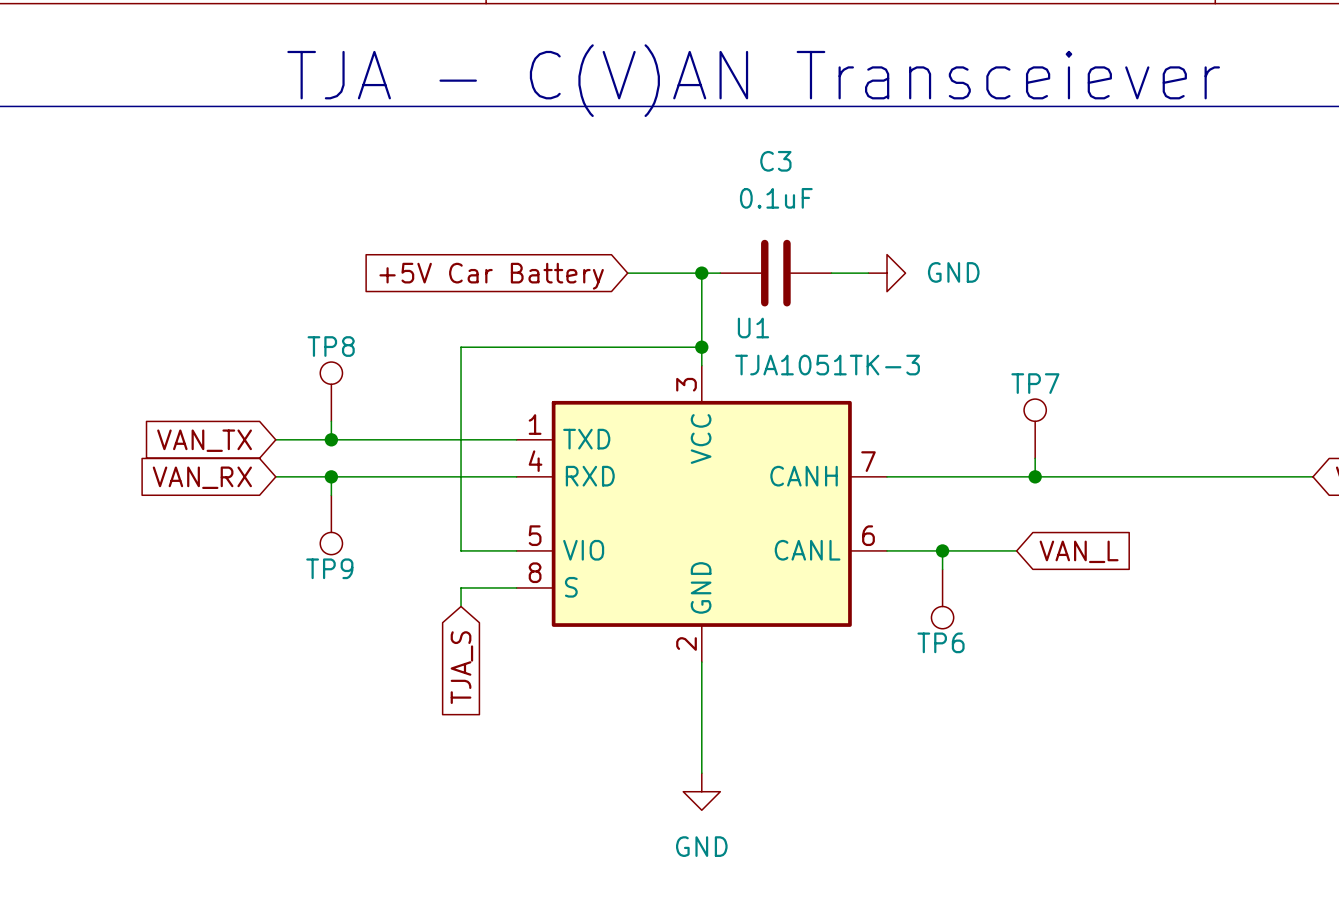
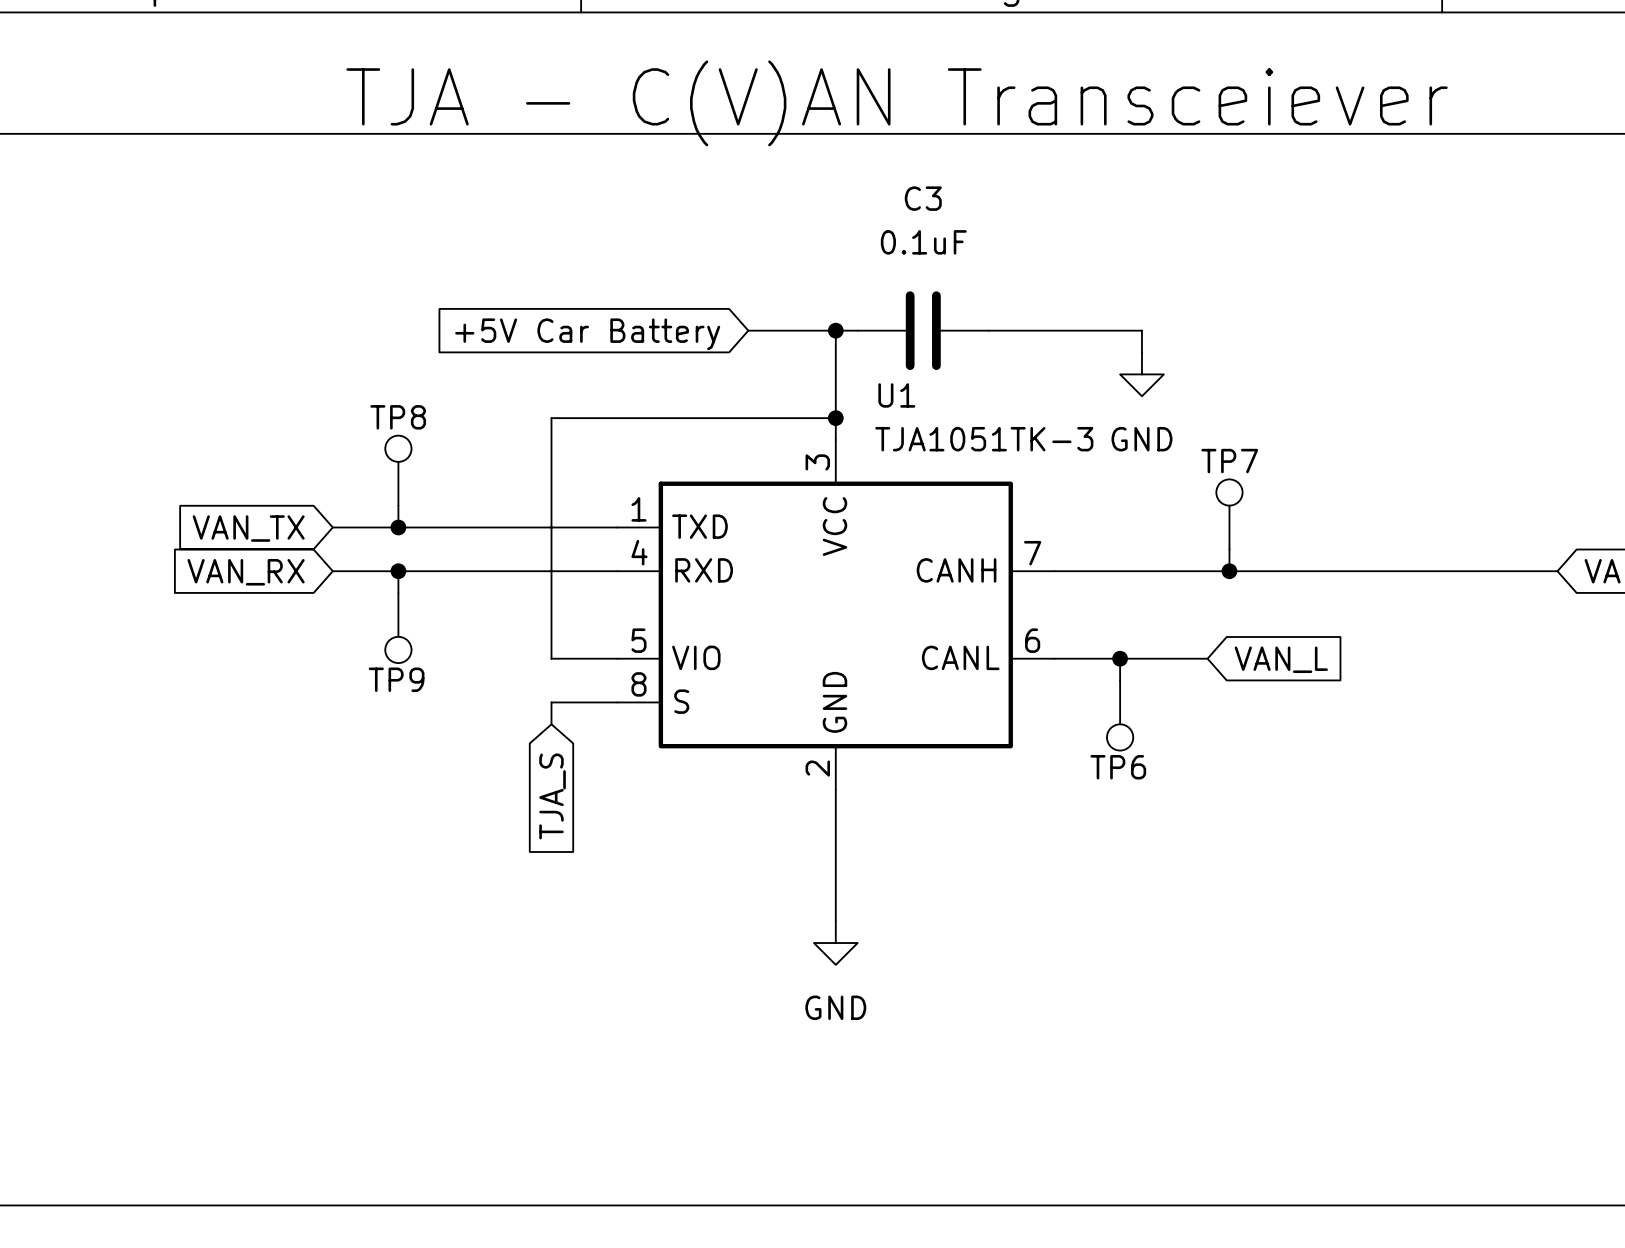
wire: none -> (1032, 330) (1141, 330) (1141, 352)
power symbol rotation: 0° (887, 273) -> 90° clockwise (1141, 374)
power symbol position: GND (887, 273) -> GND (1141, 374)

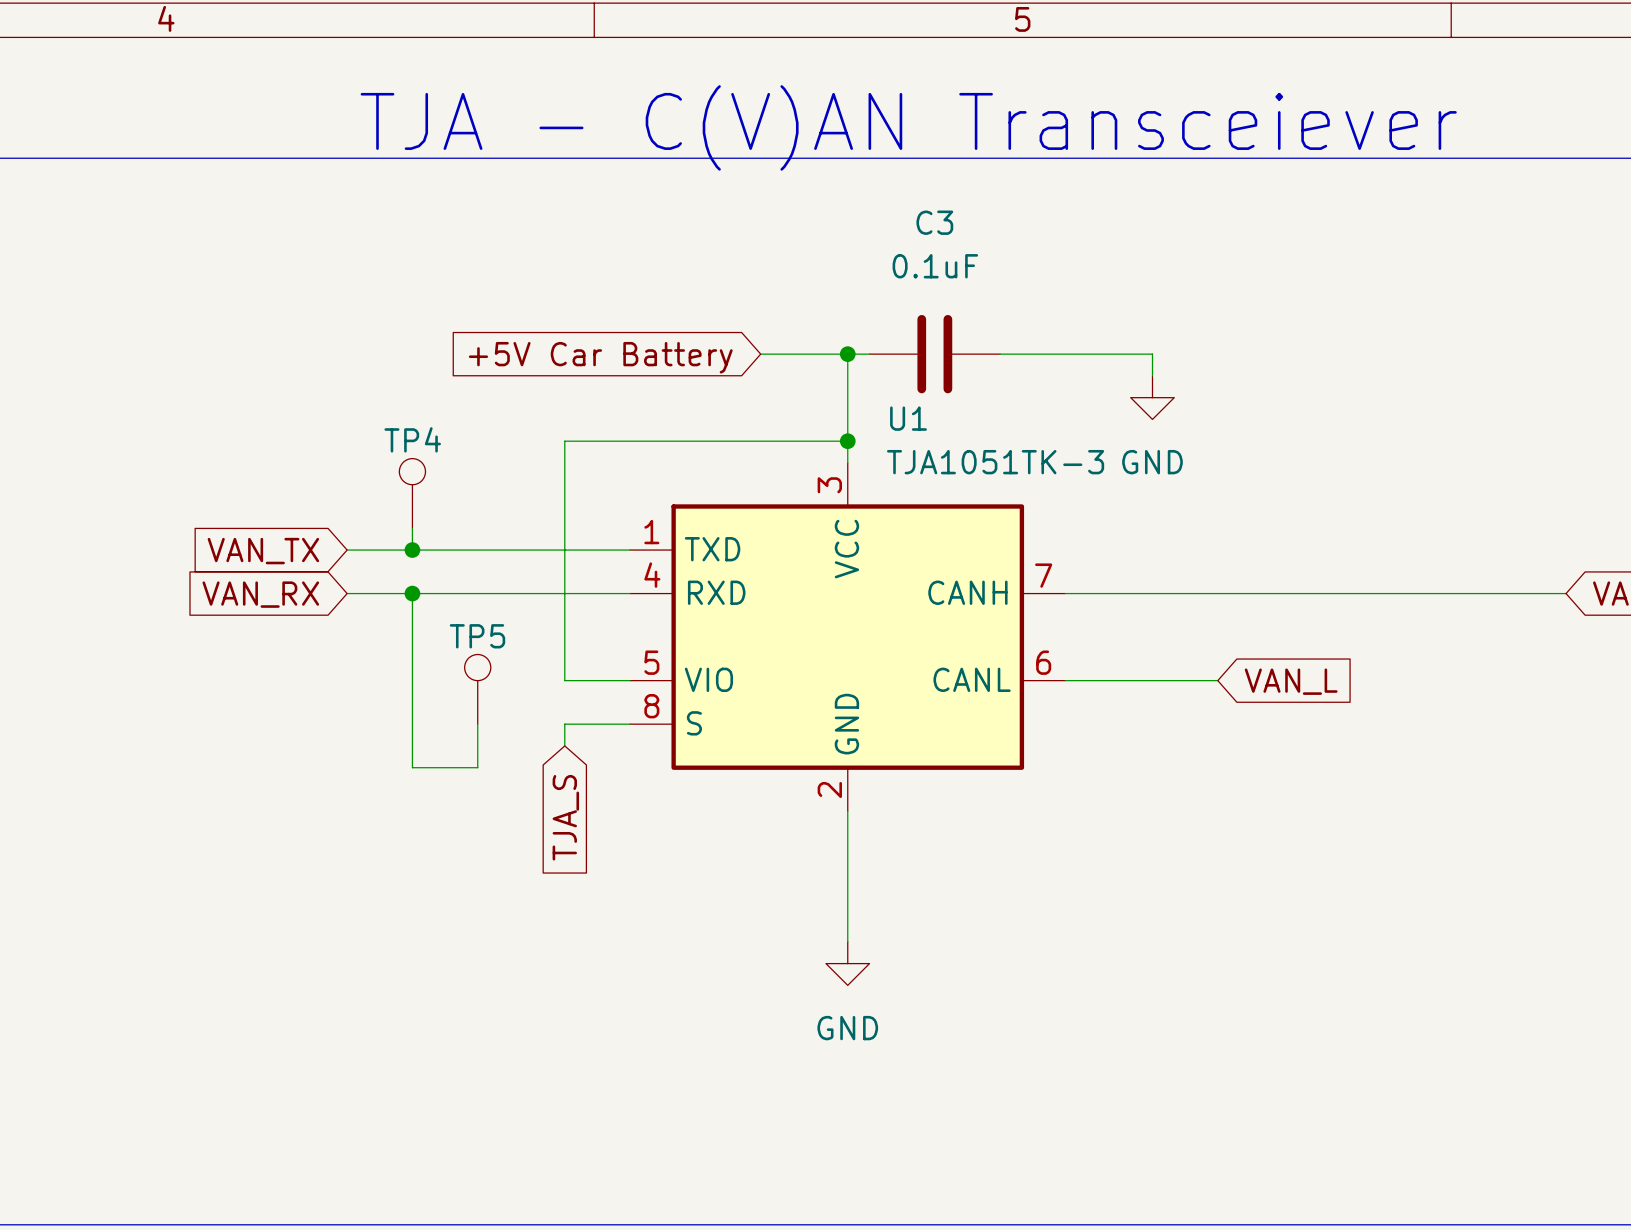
TP8 name: TP8 (398, 417) -> TP4 (412, 439)
TP7: (1229, 514) -> none
wire: (1229, 549) (1229, 571) -> none
junction: (1229, 571) -> none
wire: none -> (412, 615) (412, 767) (477, 767) (477, 724)
TP9: (398, 628) -> none
wire: (1120, 658) (1120, 680) -> none
junction: (1120, 658) -> none
TP5: none -> (477, 689)
TP6: (1120, 715) -> none

